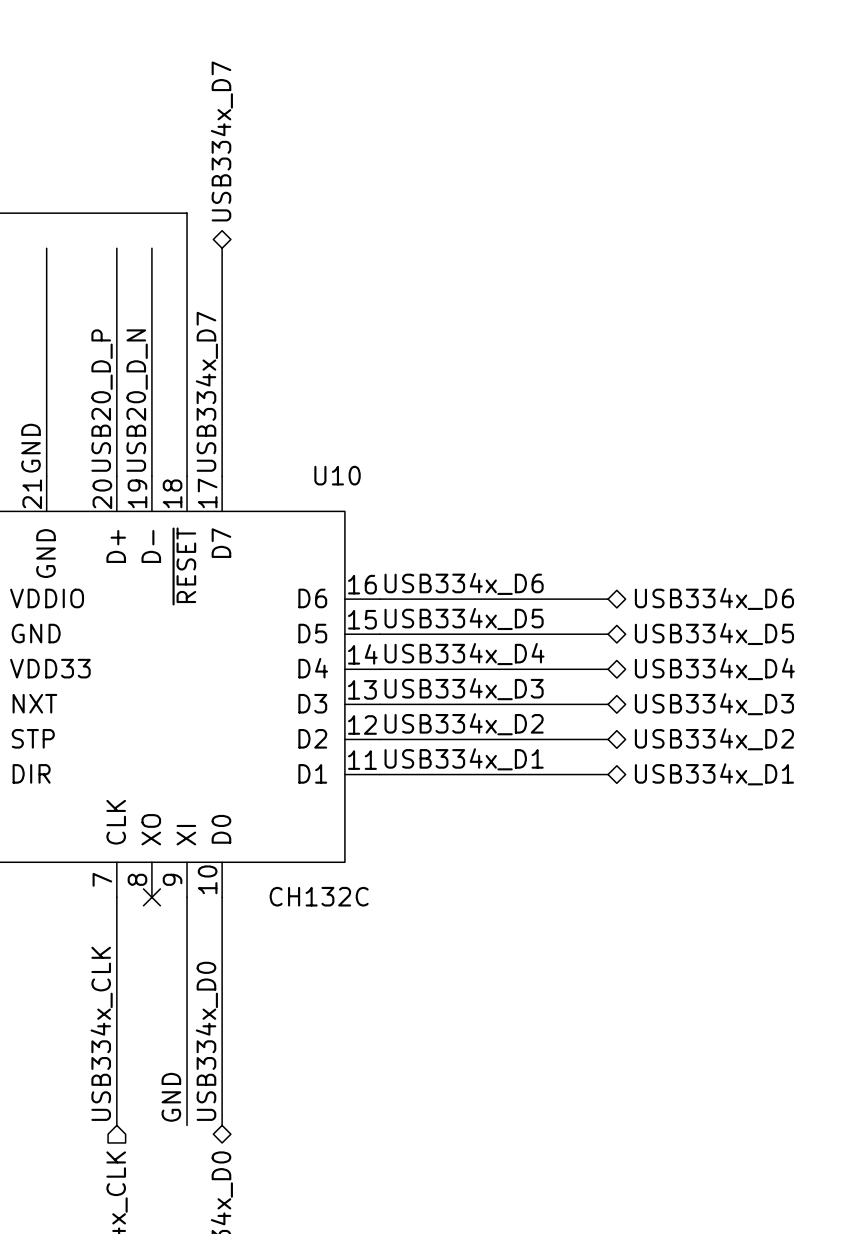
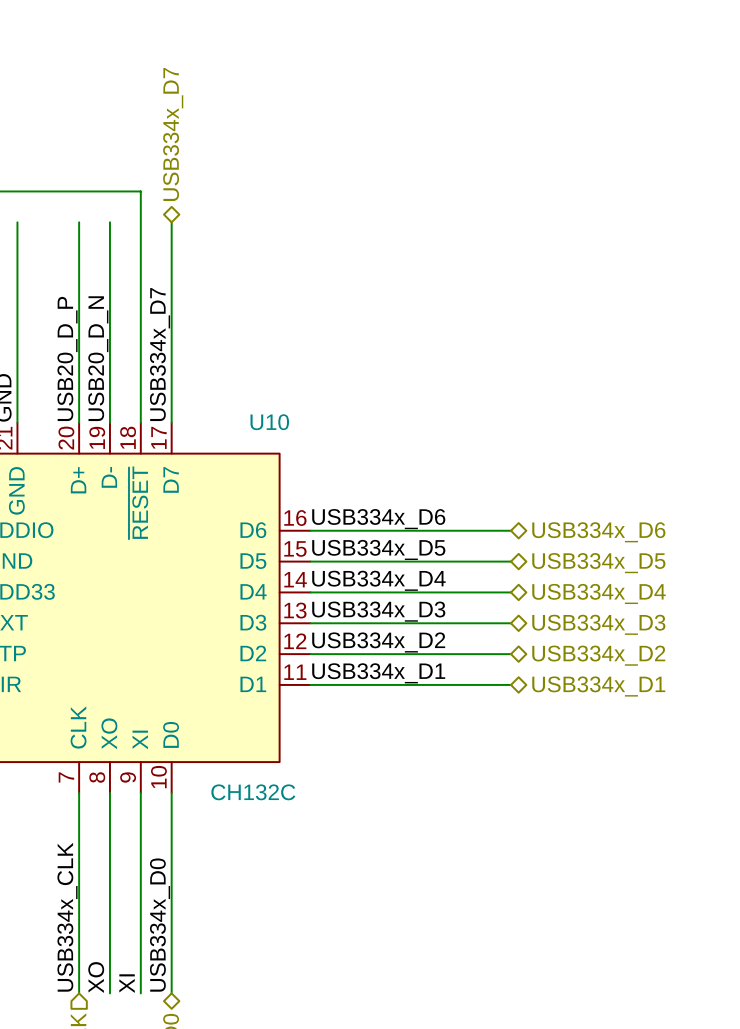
wire: none -> (109, 792) (109, 993)
no-connect mark: (151, 897) -> none
label: GND (171, 1097) -> XI (127, 983)
label: none -> XO (96, 977)

